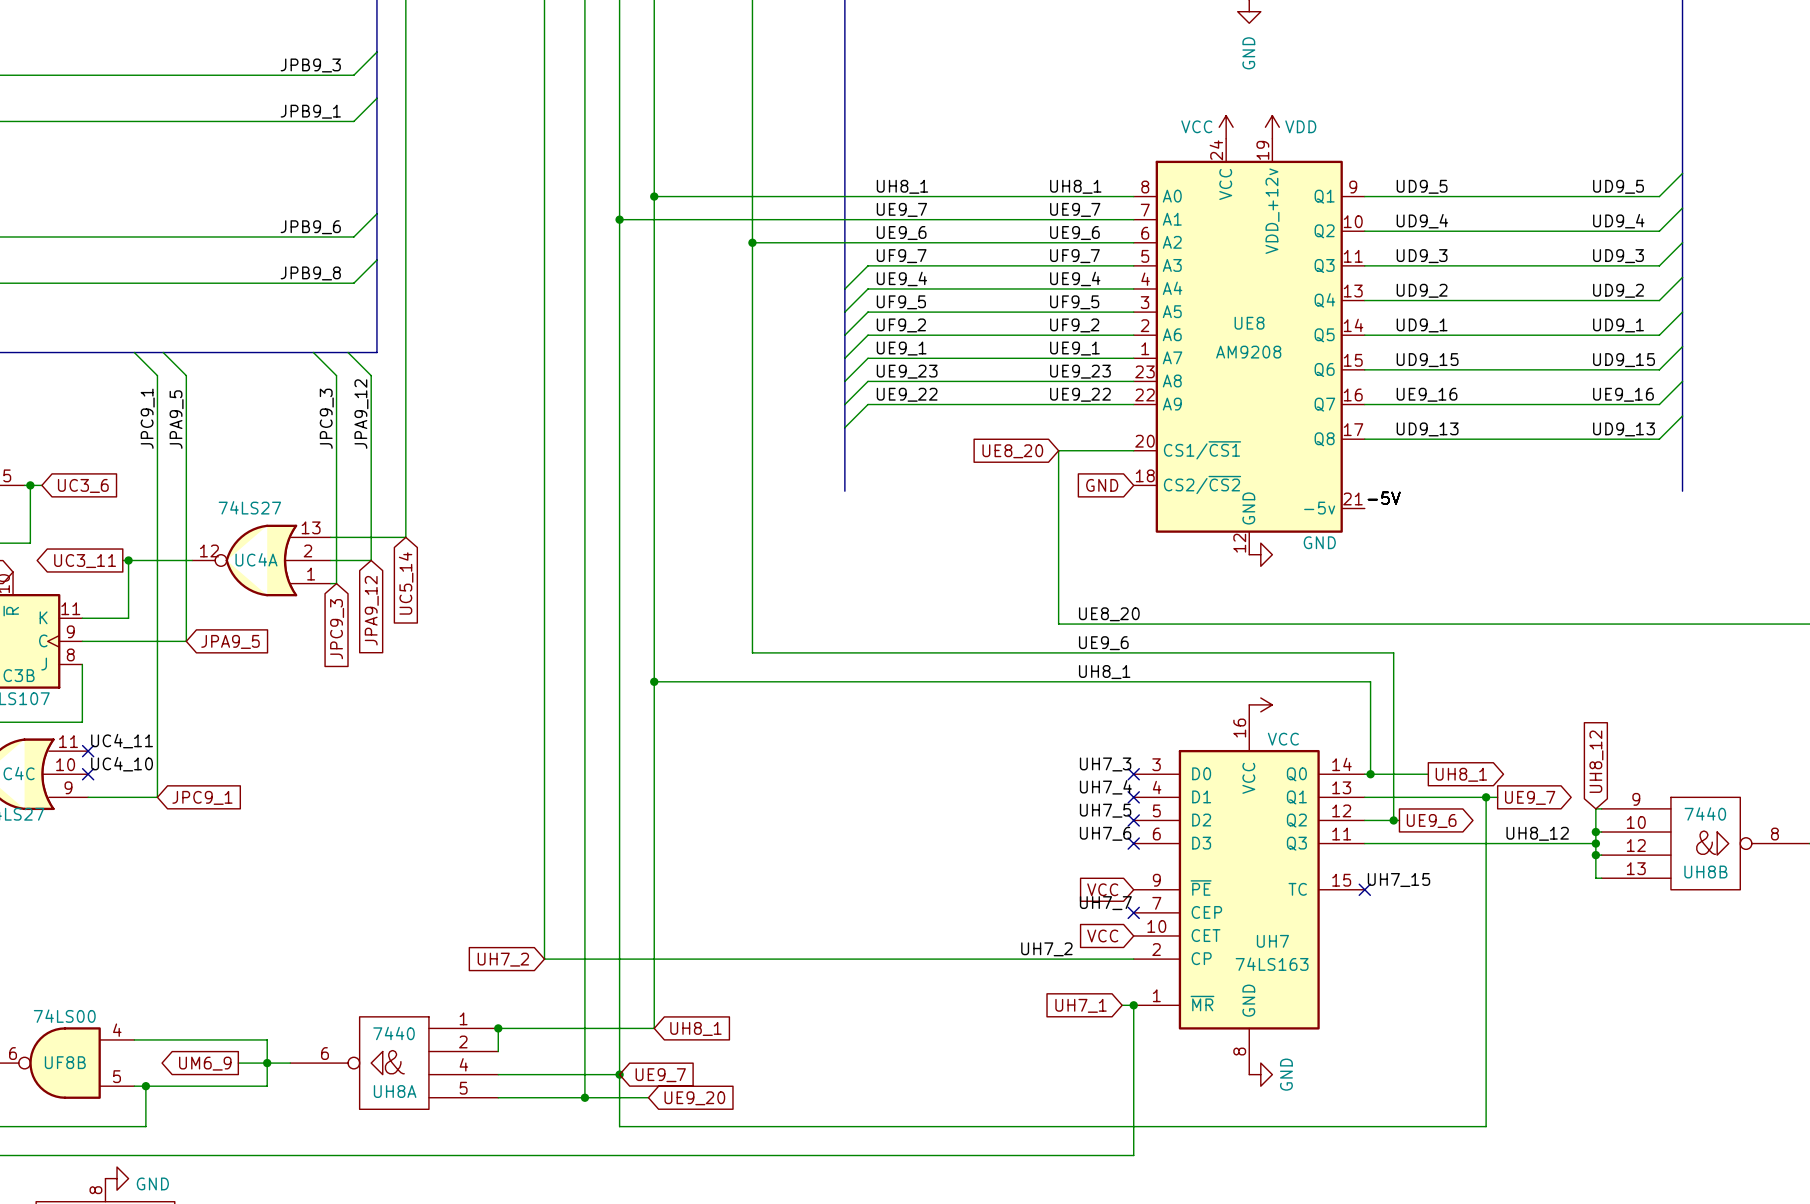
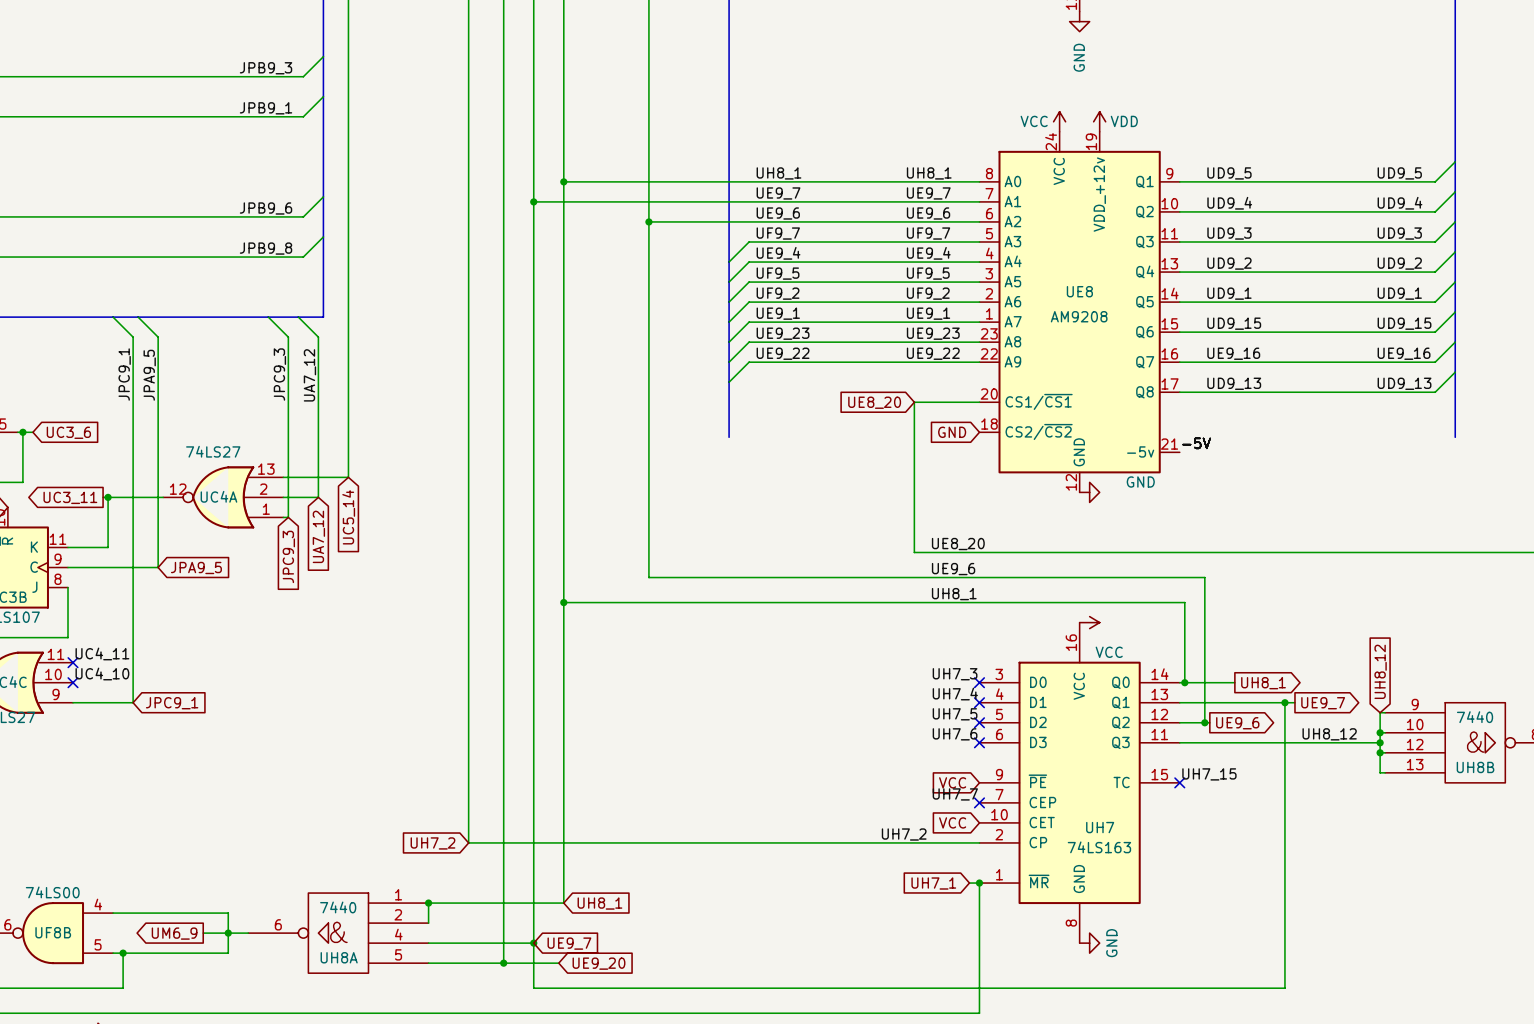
label: JPA9_12 (361, 414) -> UA7_12 (309, 375)
global label: JPA9_12 (371, 610) -> UA7_12 (318, 536)

